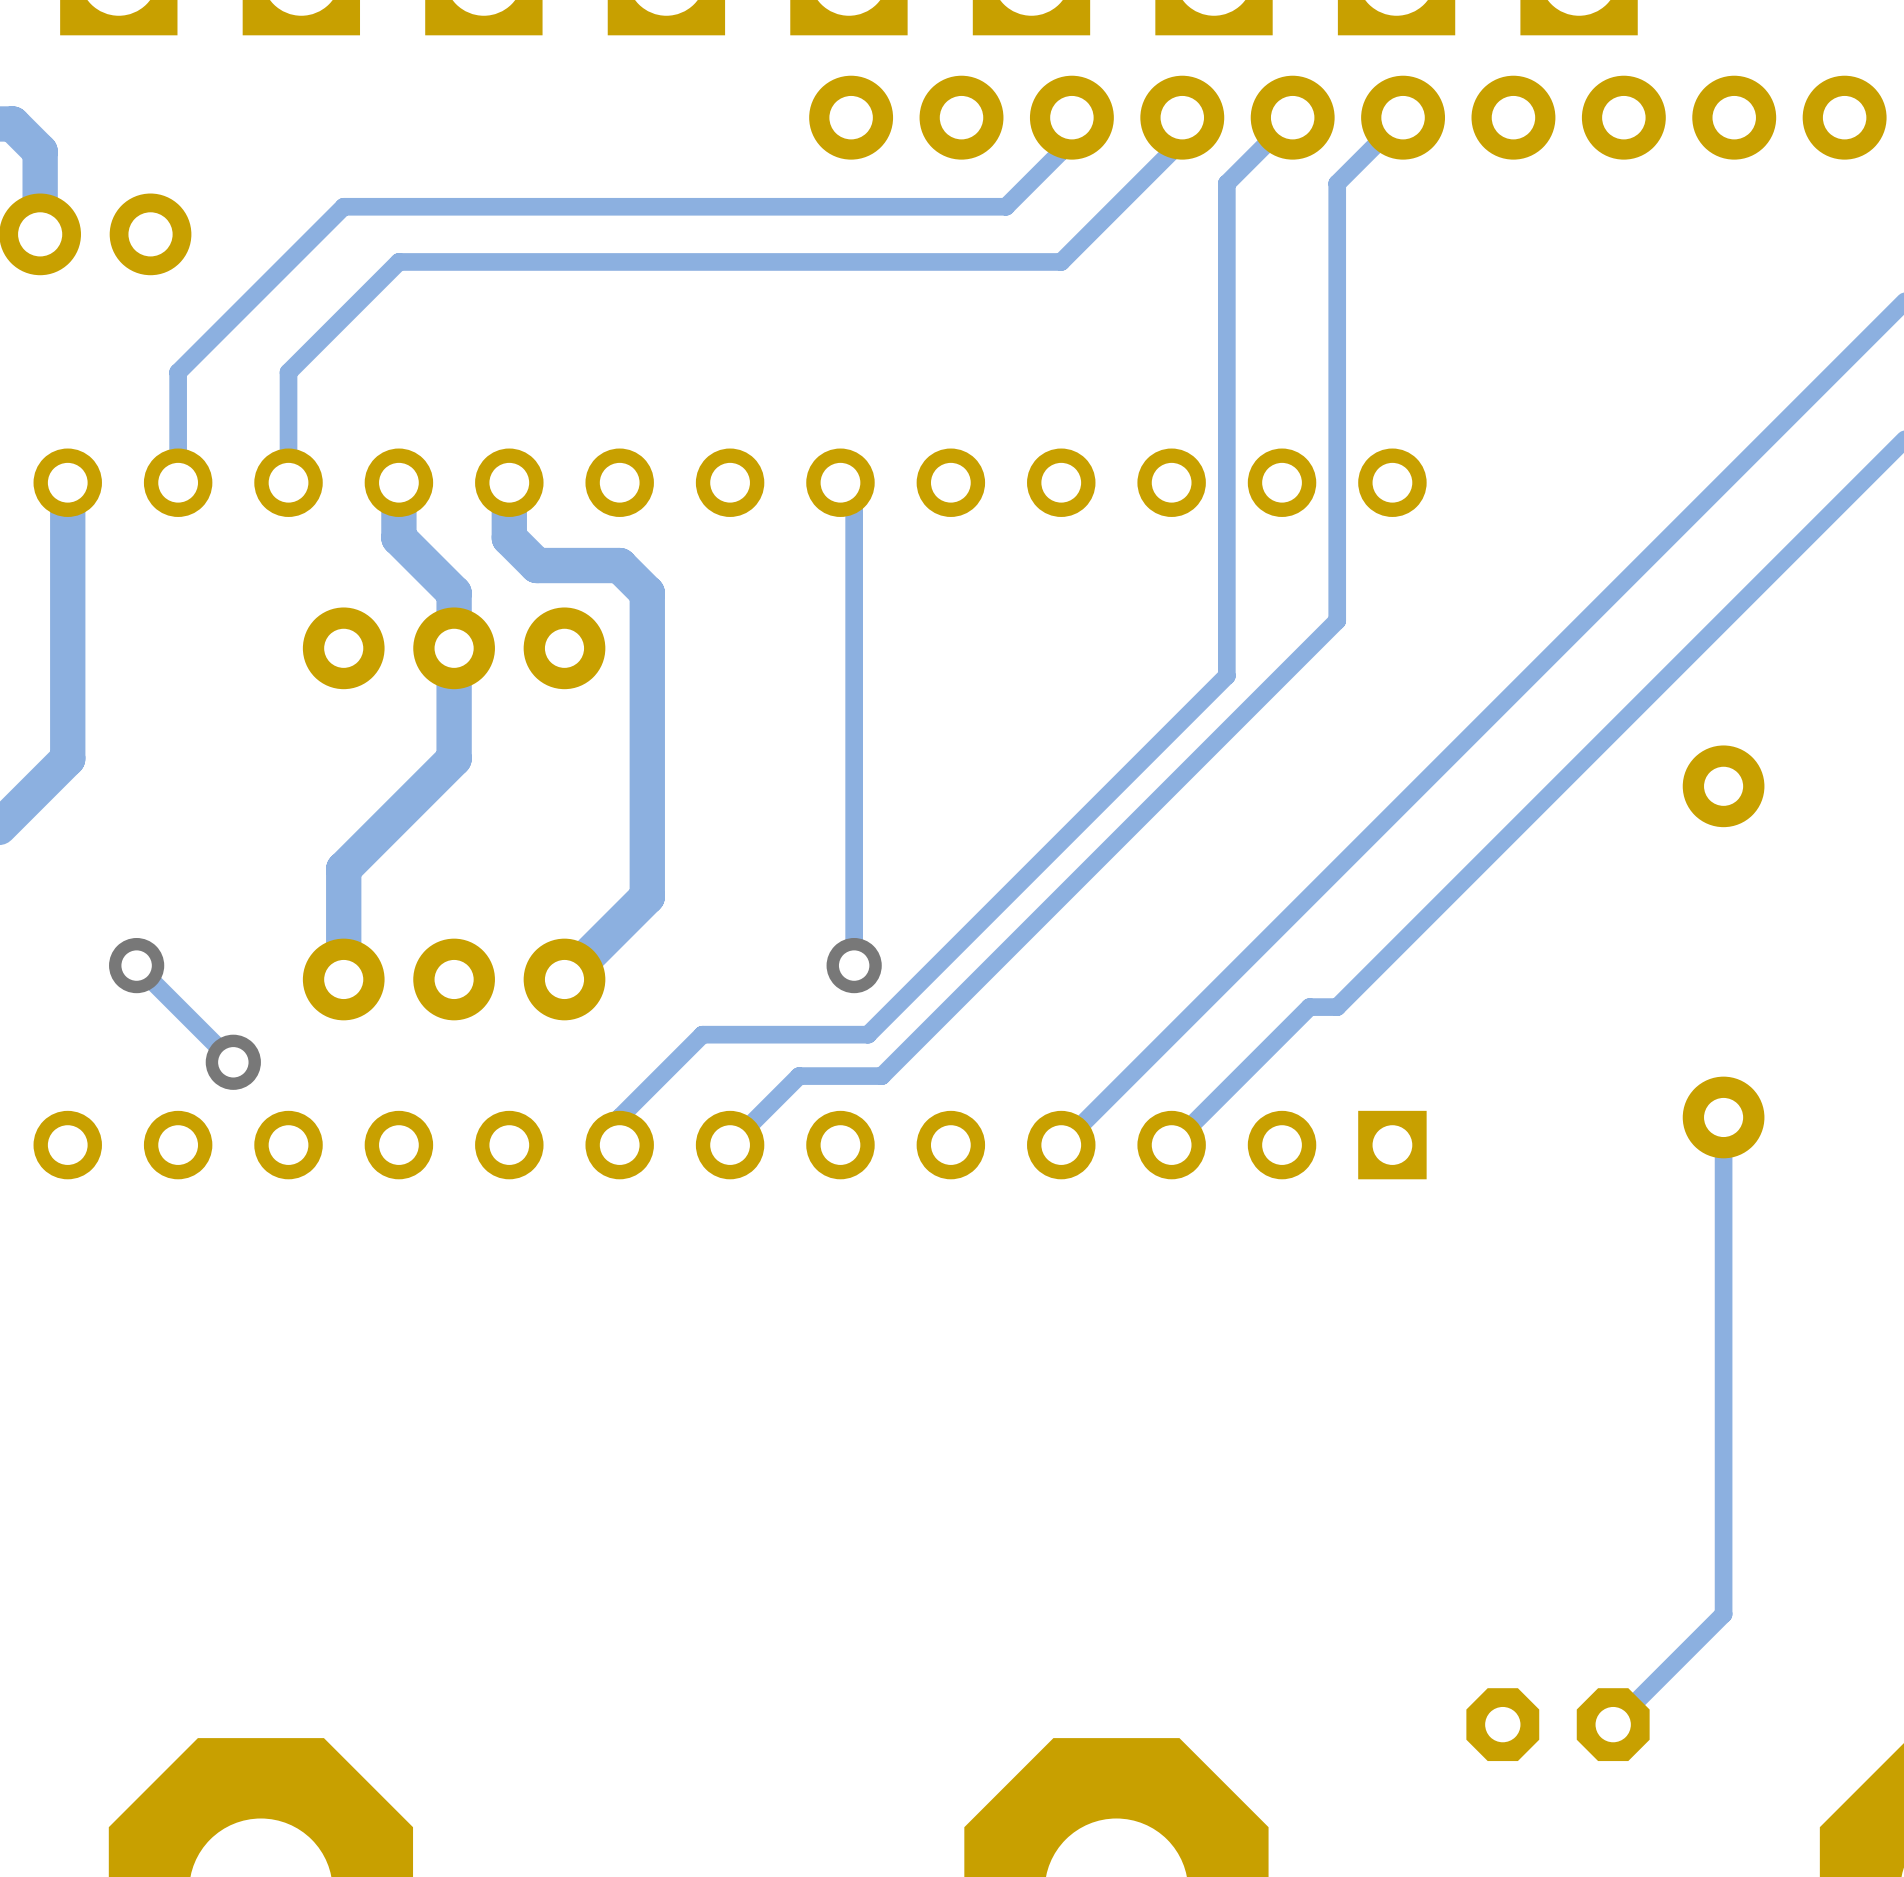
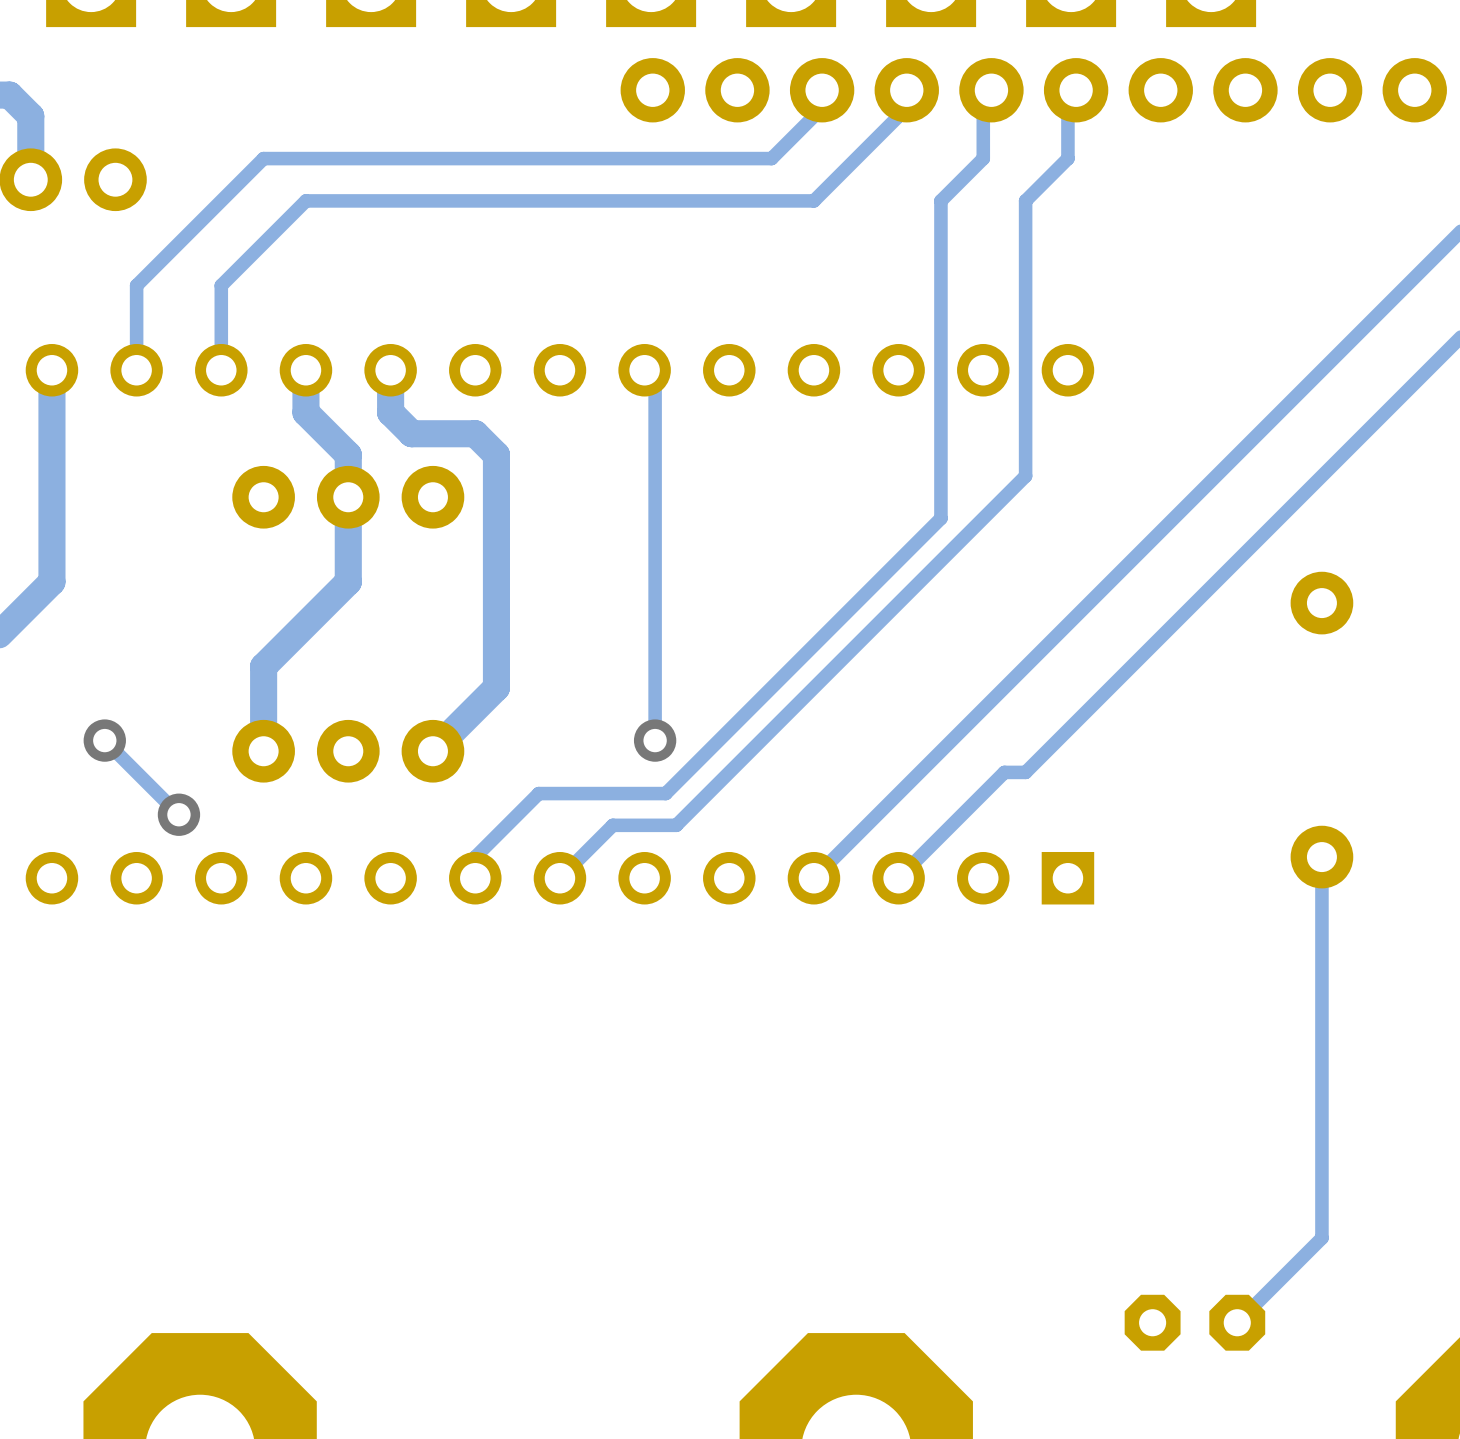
track: (1282, 128) (1226, 183) (1226, 261) -> (983, 98) (983, 158) (940, 200)
track: (1392, 128) (1337, 183) (1337, 261) -> (1067, 98) (1067, 158) (1025, 200)

